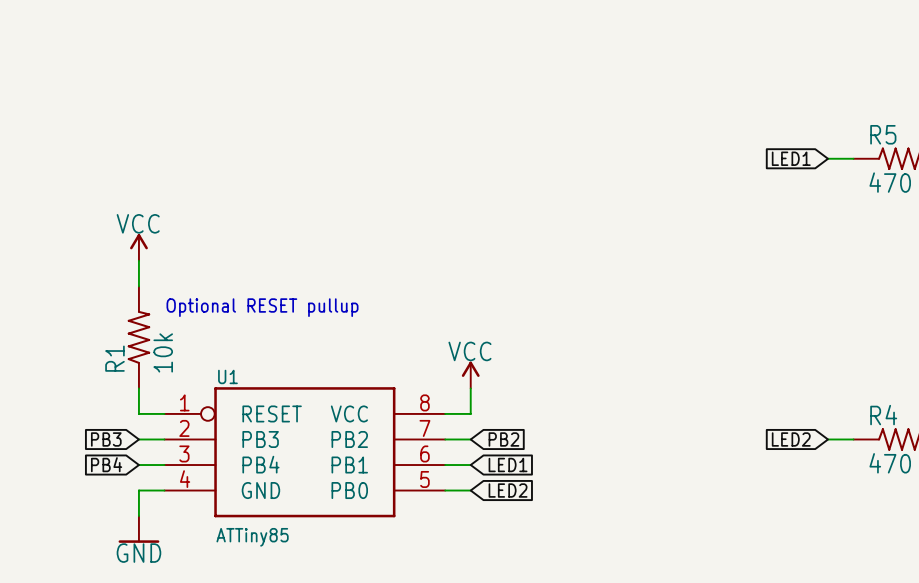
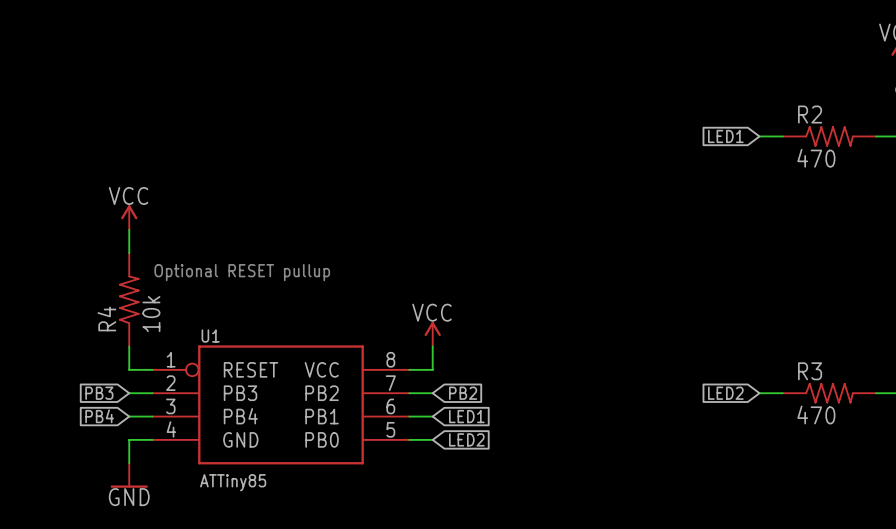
R5 name: R5 (883, 134) -> R2 (810, 114)
R1 name: R1 (114, 358) -> R4 (106, 318)
R4 name: R4 (883, 415) -> R3 (810, 371)

